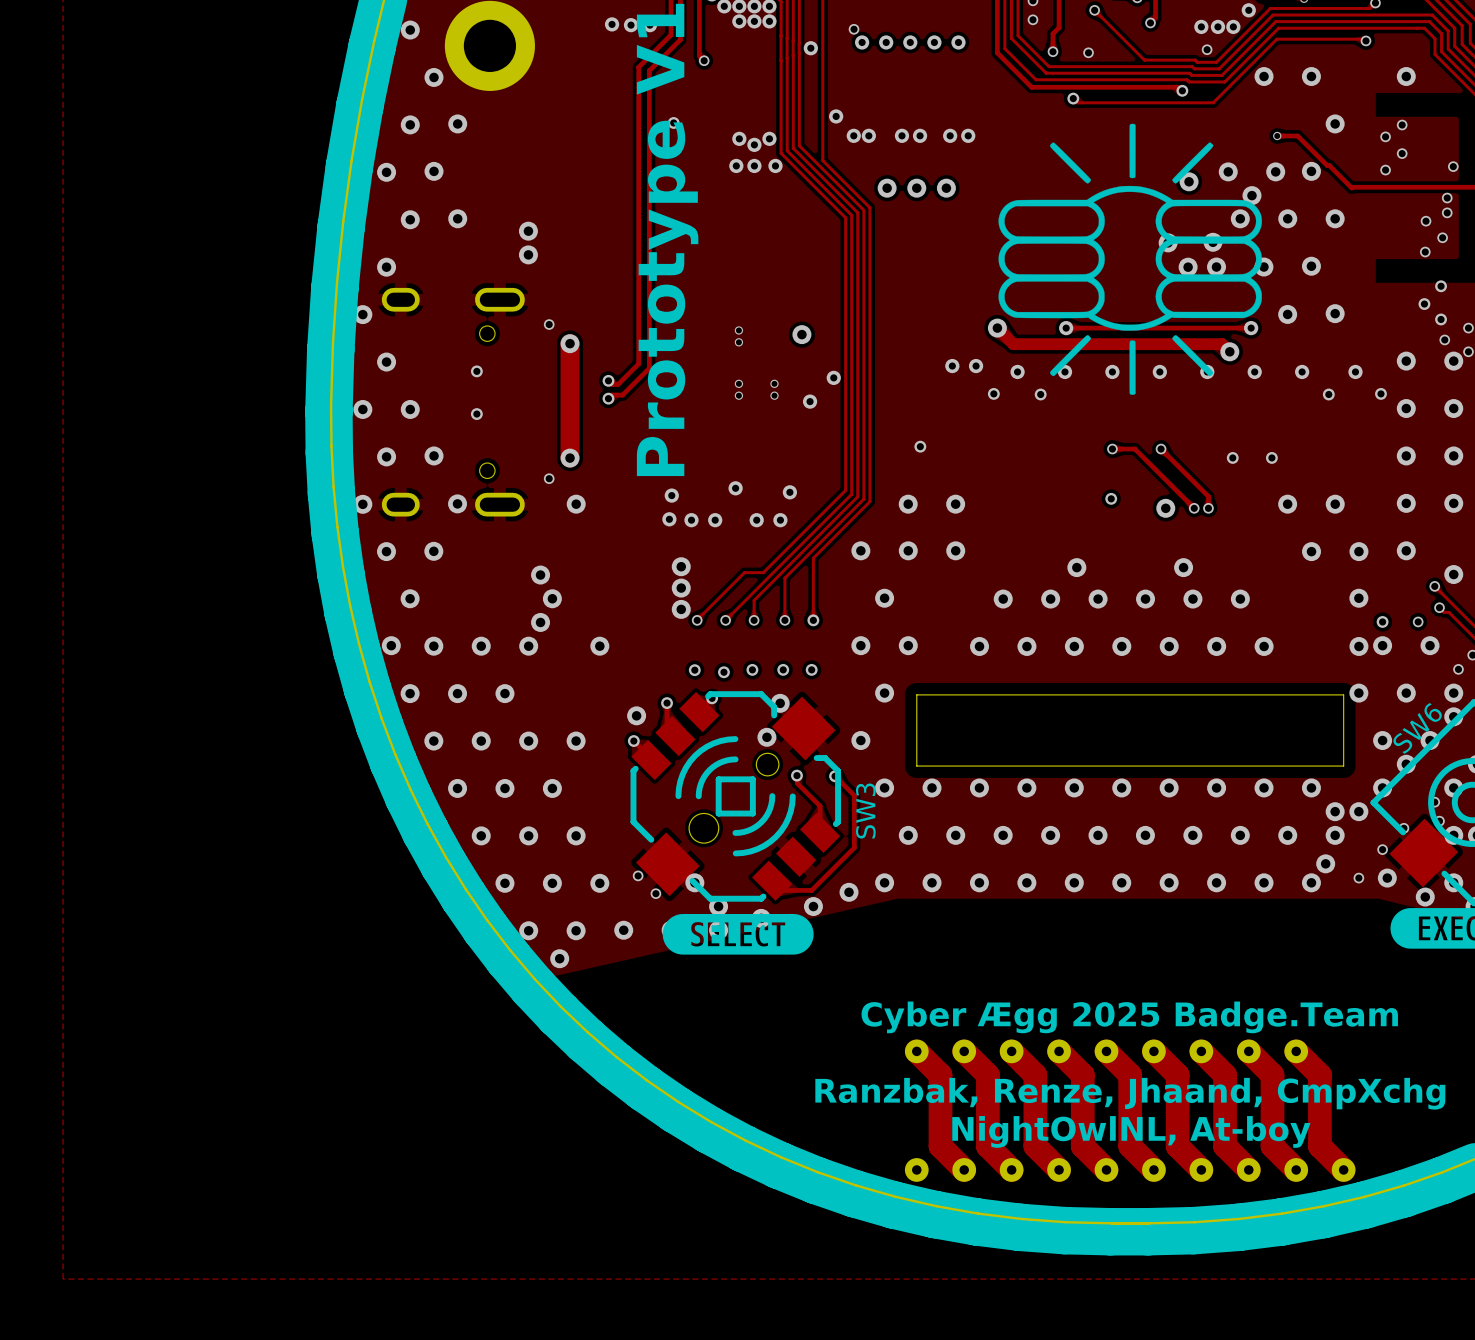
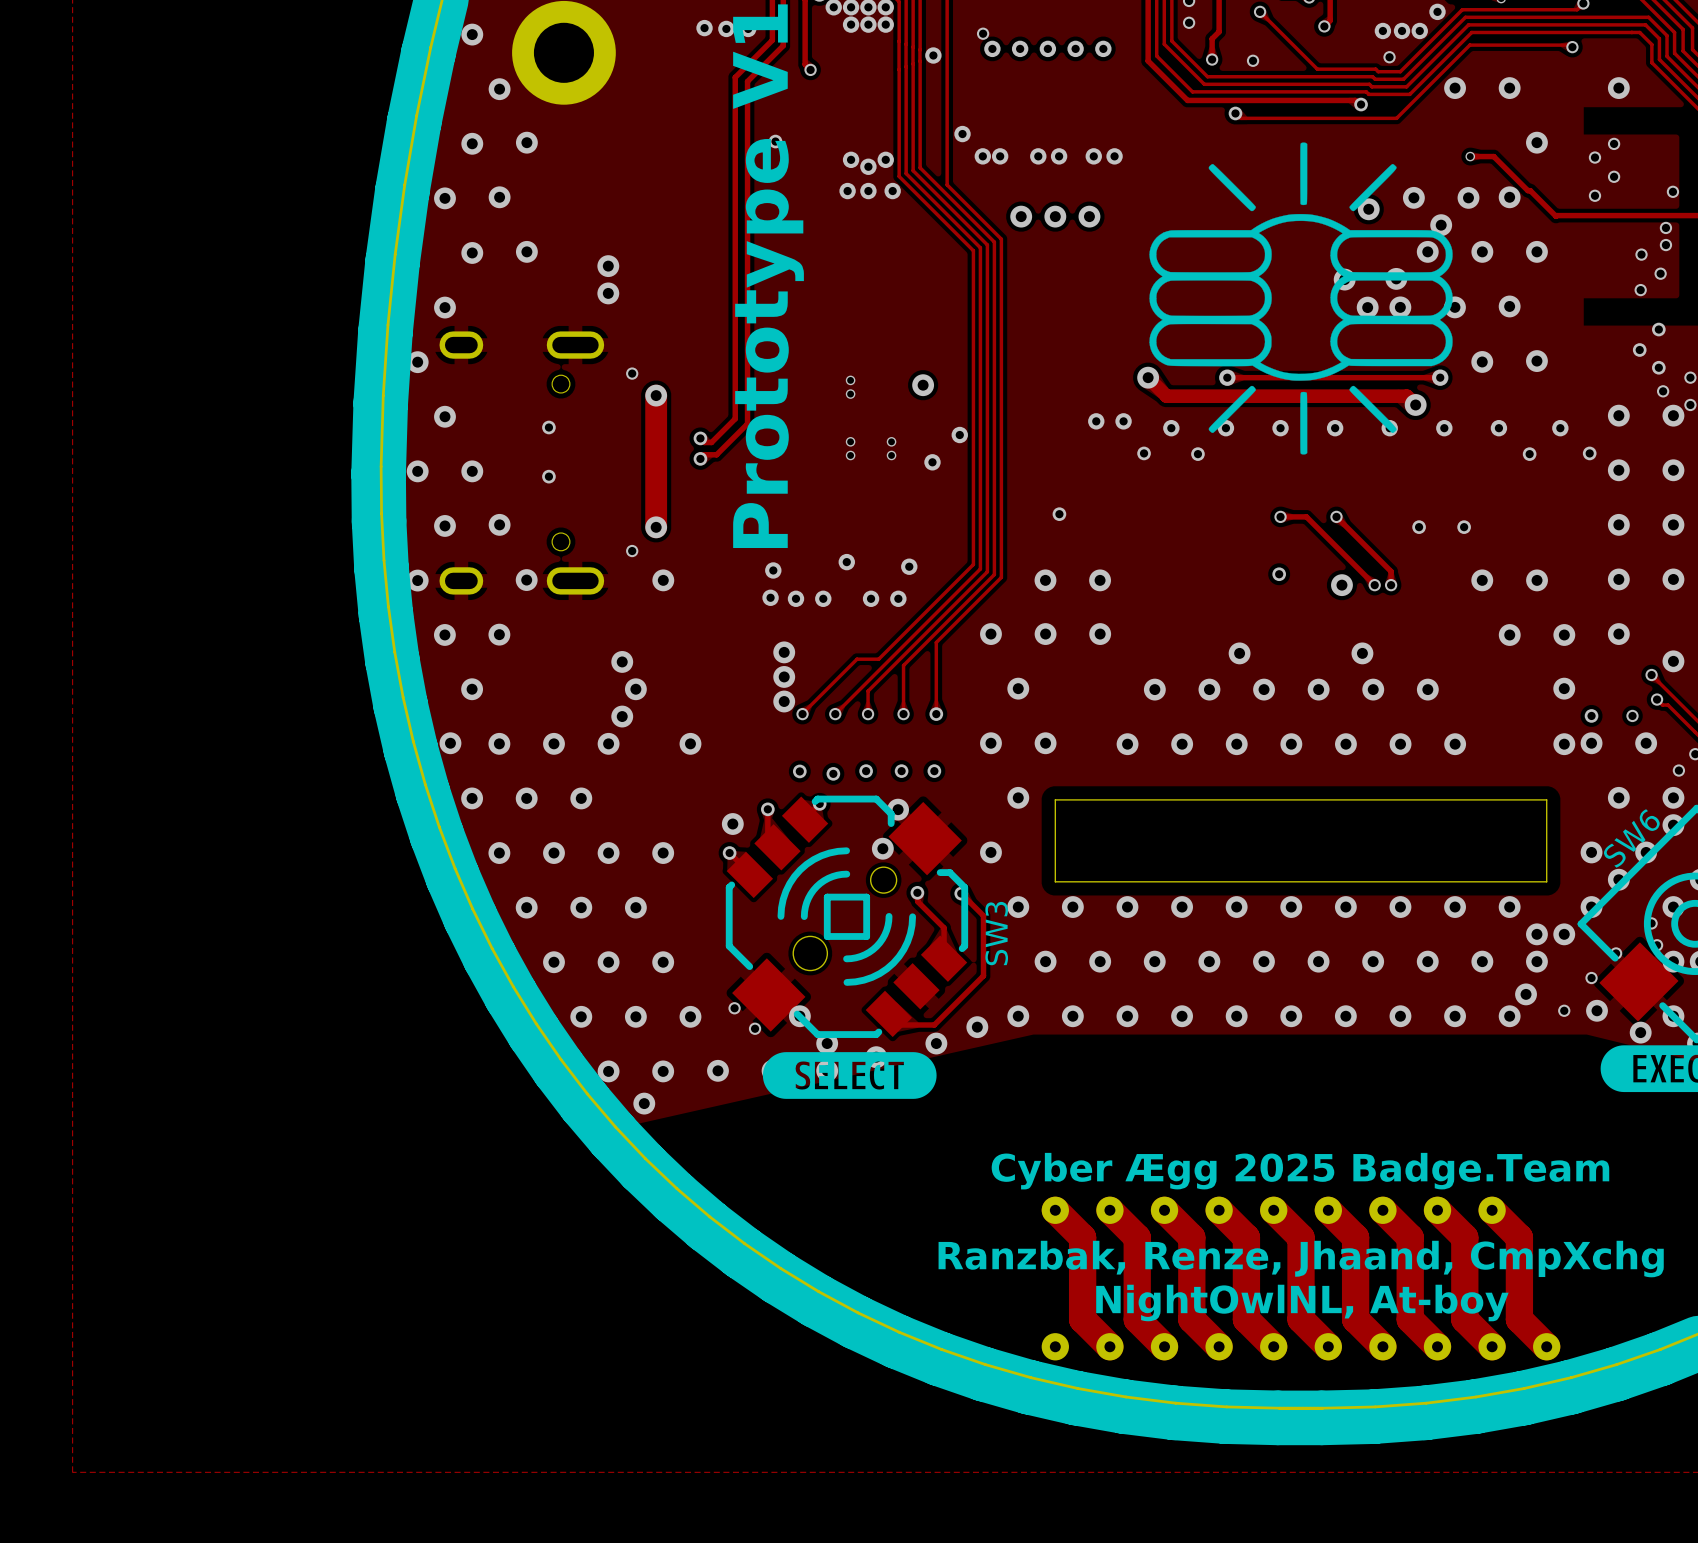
via: (1358, 693) -> none

